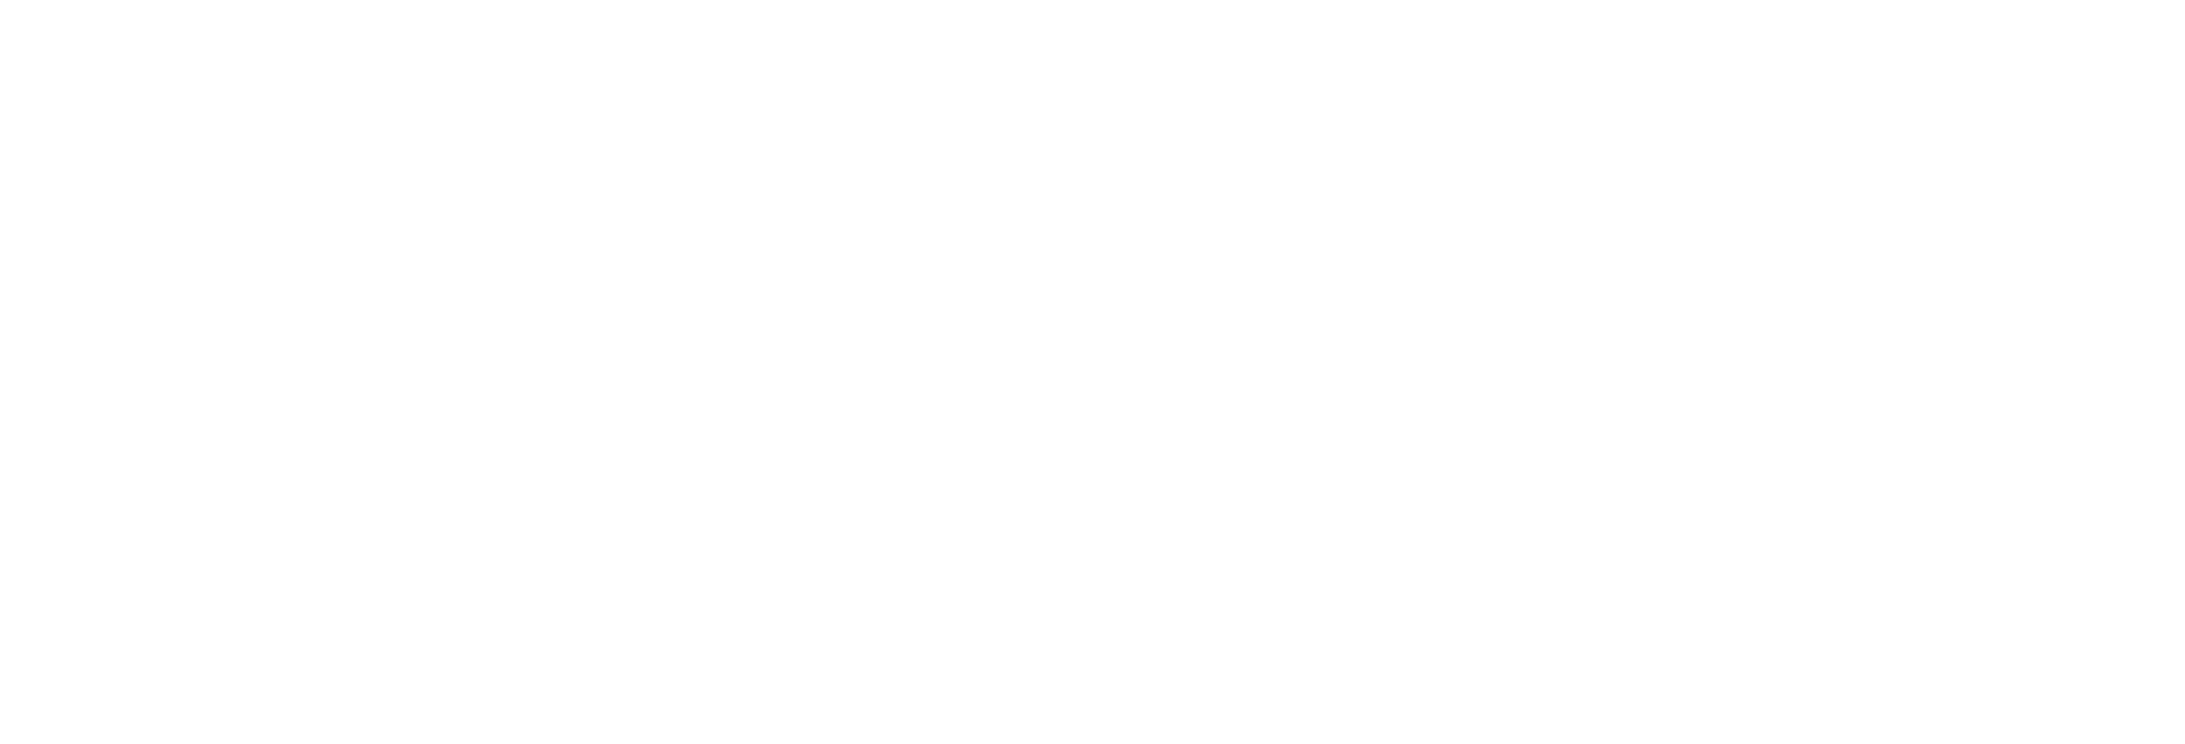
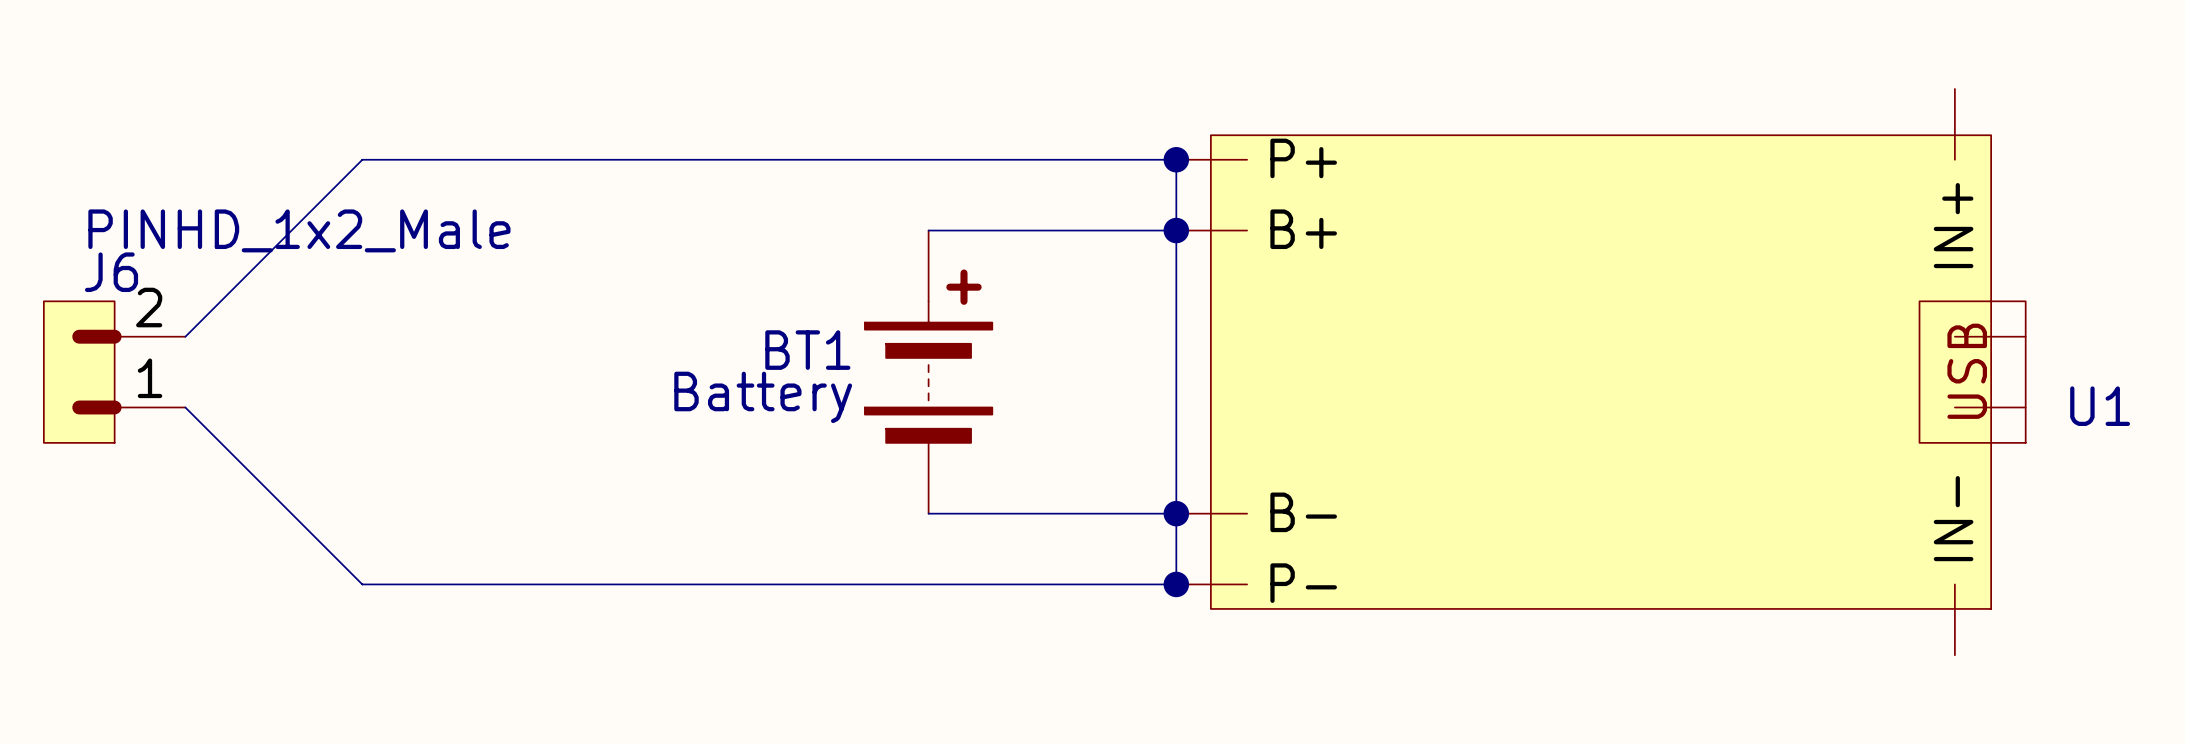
junction: none -> (1176, 159)
wire: none -> (928, 230) (1176, 230)
junction: none -> (1176, 230)
wire: none -> (185, 336) (362, 159) (1176, 159) (1176, 584) (362, 584) (185, 407)
J6: none -> PINHD_1x2_Male (114, 372)
BT1: none -> Battery (928, 372)
U1: none -> (1601, 372)
wire: none -> (928, 513) (1176, 513)
junction: none -> (1176, 513)
junction: none -> (1176, 584)

